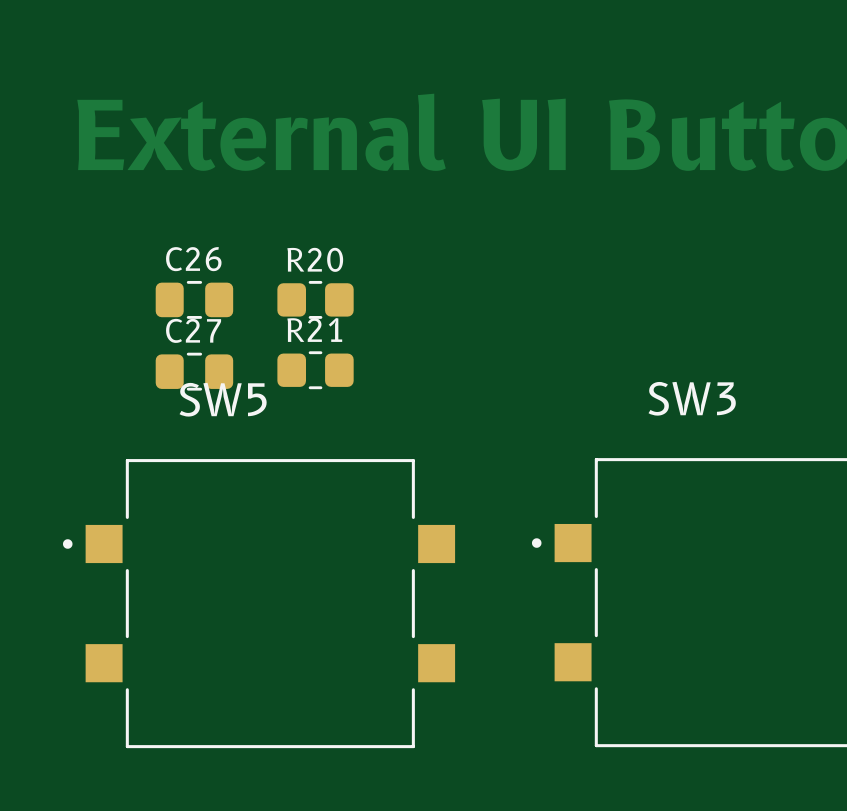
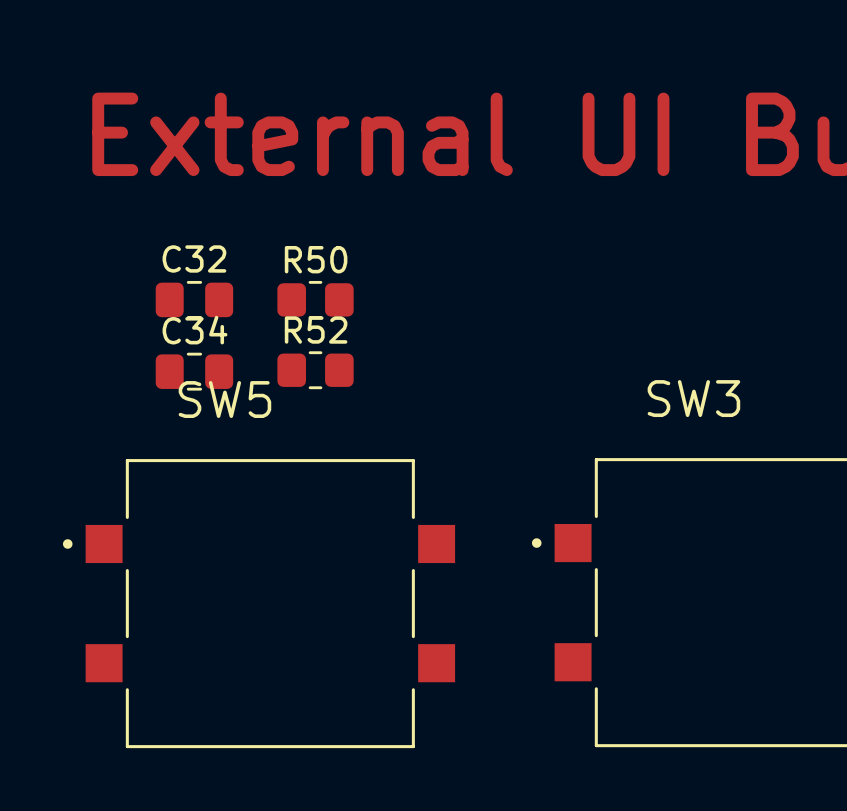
C26 name: C26 (193, 259) -> C32 (194, 258)
R20 name: R20 (315, 259) -> R50 (316, 259)
C27 name: C27 (193, 330) -> C34 (195, 330)
R21 name: R21 (314, 330) -> R52 (316, 330)

